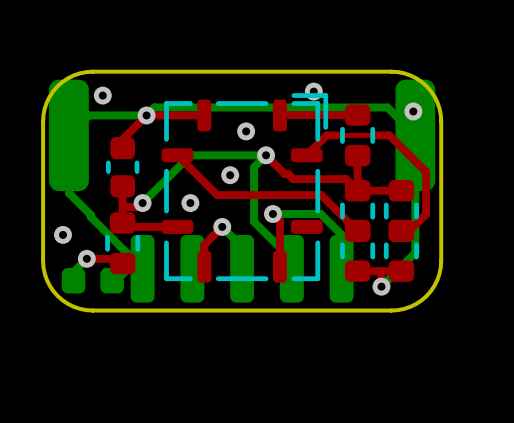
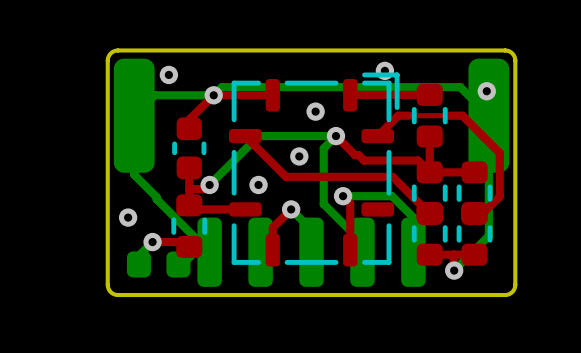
board edge: (92, 71) (73, 75) (57, 86) (46, 102) (43, 121) -> (158, 50) (116, 50) (110, 53) (107, 59) (107, 101)
board edge: (391, 71) (410, 75) (426, 86) (437, 102) (441, 121) -> (464, 50) (506, 50) (512, 53) (515, 59) (515, 101)
board edge: (43, 260) (46, 279) (57, 295) (73, 306) (92, 310) -> (107, 244) (107, 285) (110, 292) (116, 294) (158, 295)
board edge: (441, 260) (437, 279) (426, 295) (410, 306) (391, 310) -> (515, 244) (515, 285) (512, 292) (506, 294) (464, 295)

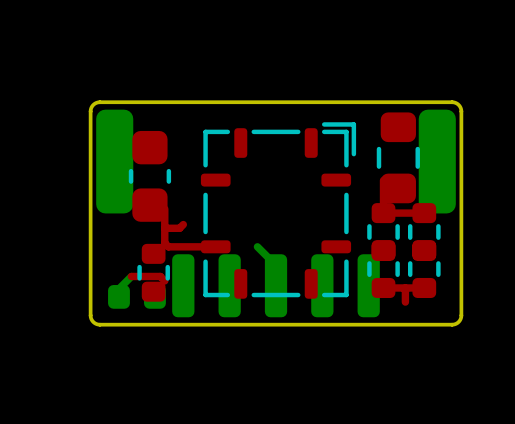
via: (384, 70) -> none
via: (168, 74) -> none
part footprint: [411, 83, 448, 148] -> [376, 112, 420, 204]
via: (486, 91) -> none
top track: (350, 94) (429, 94) -> none
via: (213, 95) -> none
top track: (272, 95) (213, 95) (189, 119) (189, 128) -> none
via: (315, 111) -> none
part footprint: [172, 117, 207, 180] -> [128, 130, 172, 222]
top track: (245, 136) (286, 176) (392, 176) (429, 213) -> none
top track: (335, 136) (355, 155) (358, 155) (364, 160) (417, 160) (429, 172) -> none
via: (335, 136) -> none
top track: (377, 136) (398, 115) (462, 115) (499, 153) (499, 196) (483, 213) (474, 213) -> none
via: (299, 156) -> none
bottom track: (209, 184) (258, 136) (335, 136) (323, 148) (323, 204) (362, 242) (362, 252) -> none
via: (209, 184) -> none
via: (258, 184) -> none
top track: (343, 196) (350, 203) (350, 250) -> none
bottom track: (343, 196) (392, 196) (413, 217) (413, 252) -> none
via: (343, 196) -> none
top track: (291, 209) (272, 227) (272, 250) -> none
via: (291, 209) -> none
via: (128, 217) -> none
part position: (189, 226) -> (153, 272)
via: (152, 242) -> none
bottom track: (178, 264) (182, 264) (194, 252) (209, 252) (134, 174) (134, 115) (154, 95) (213, 95) (221, 87) (460, 87) (488, 115) (488, 235) (454, 270) -> none
via: (454, 270) -> none

